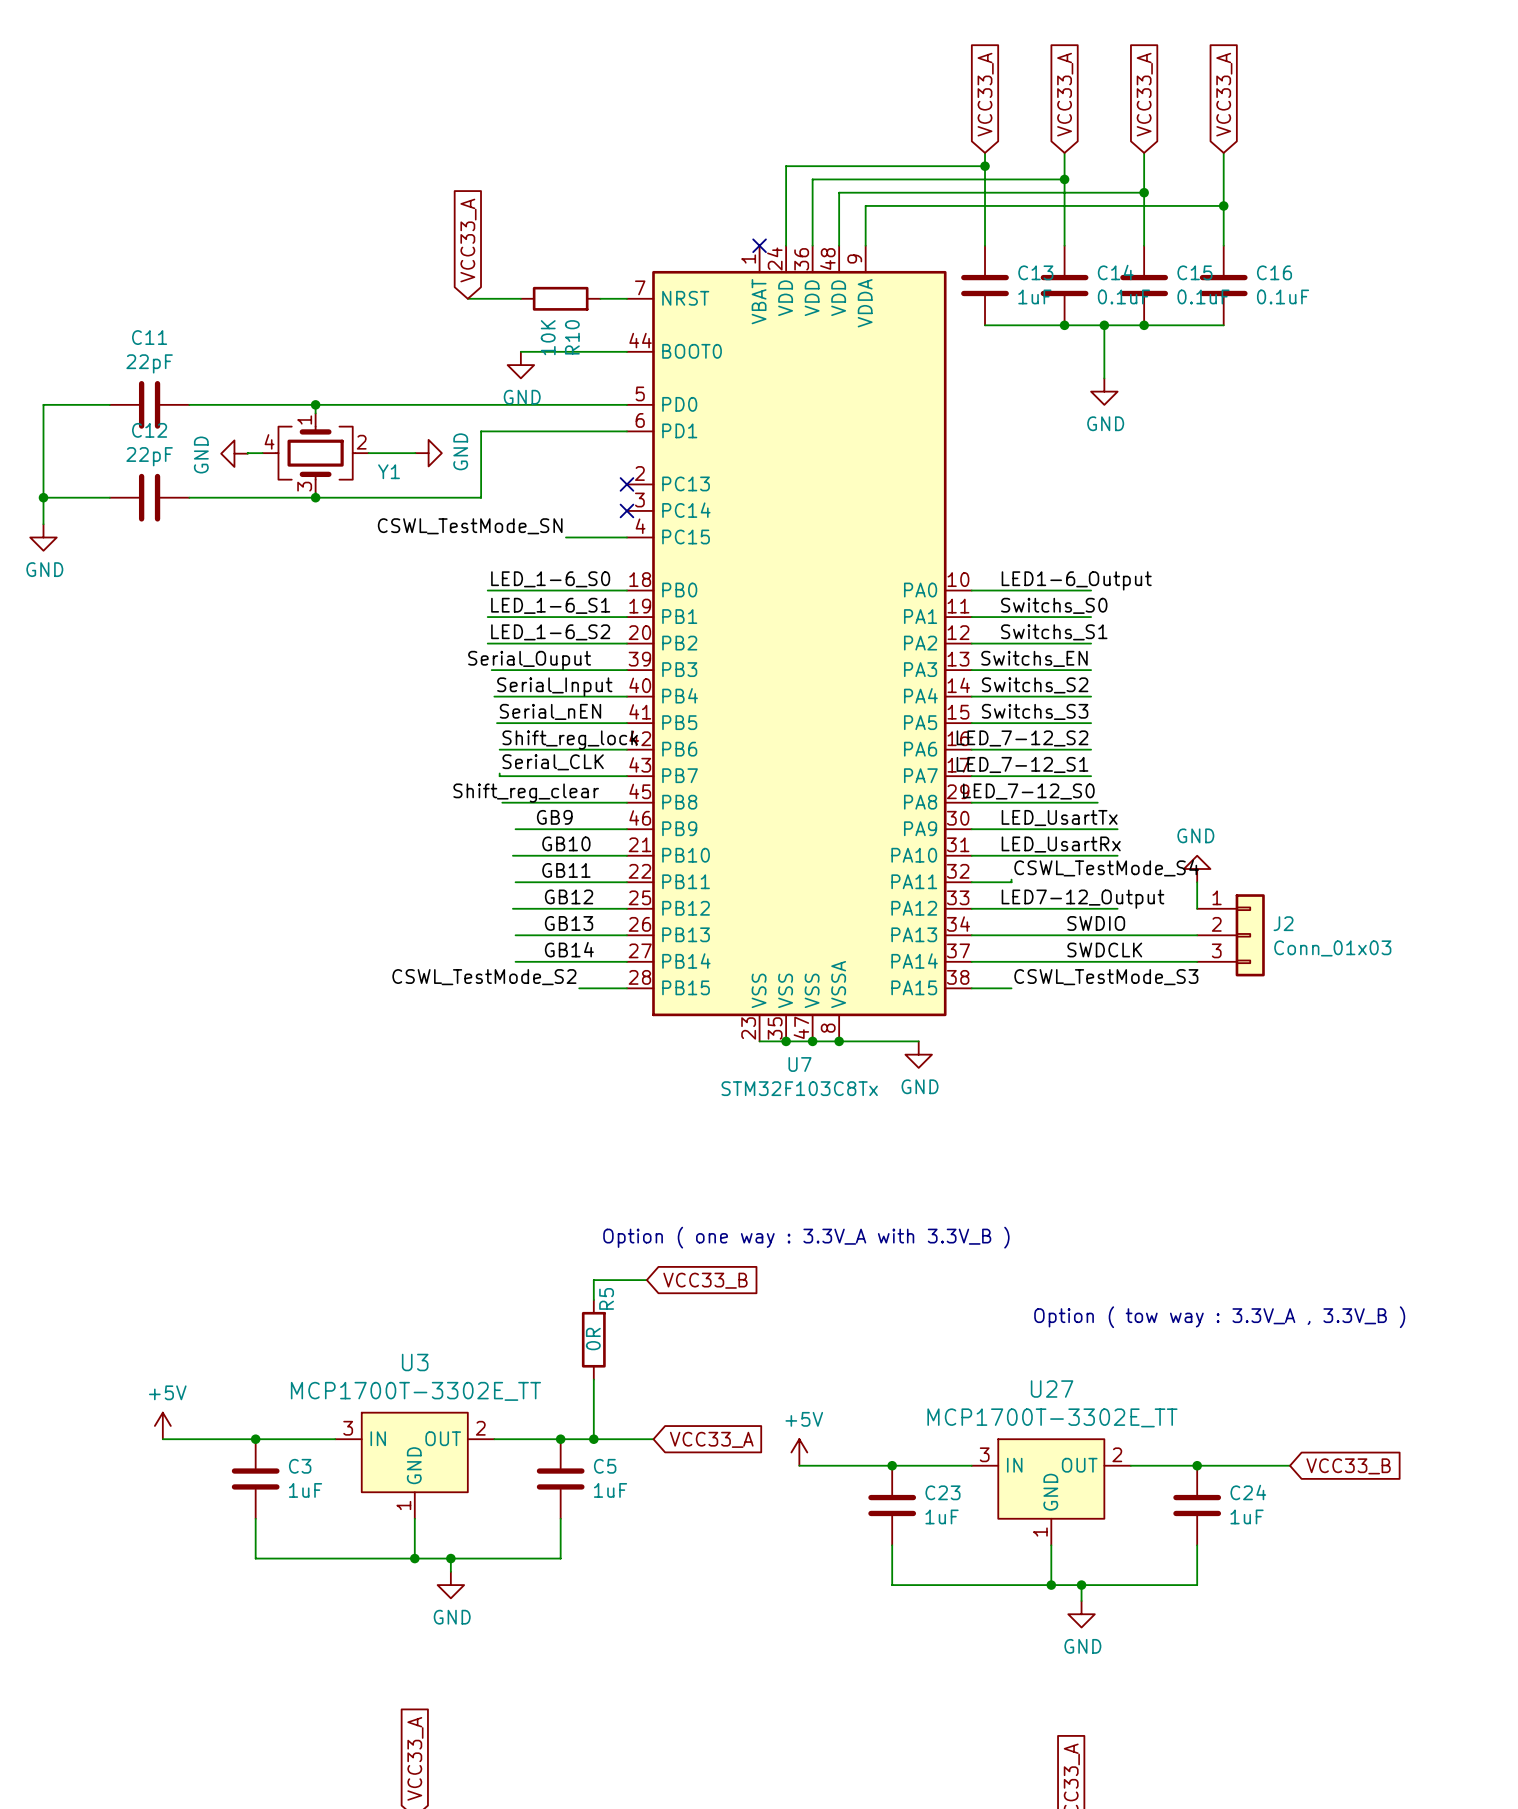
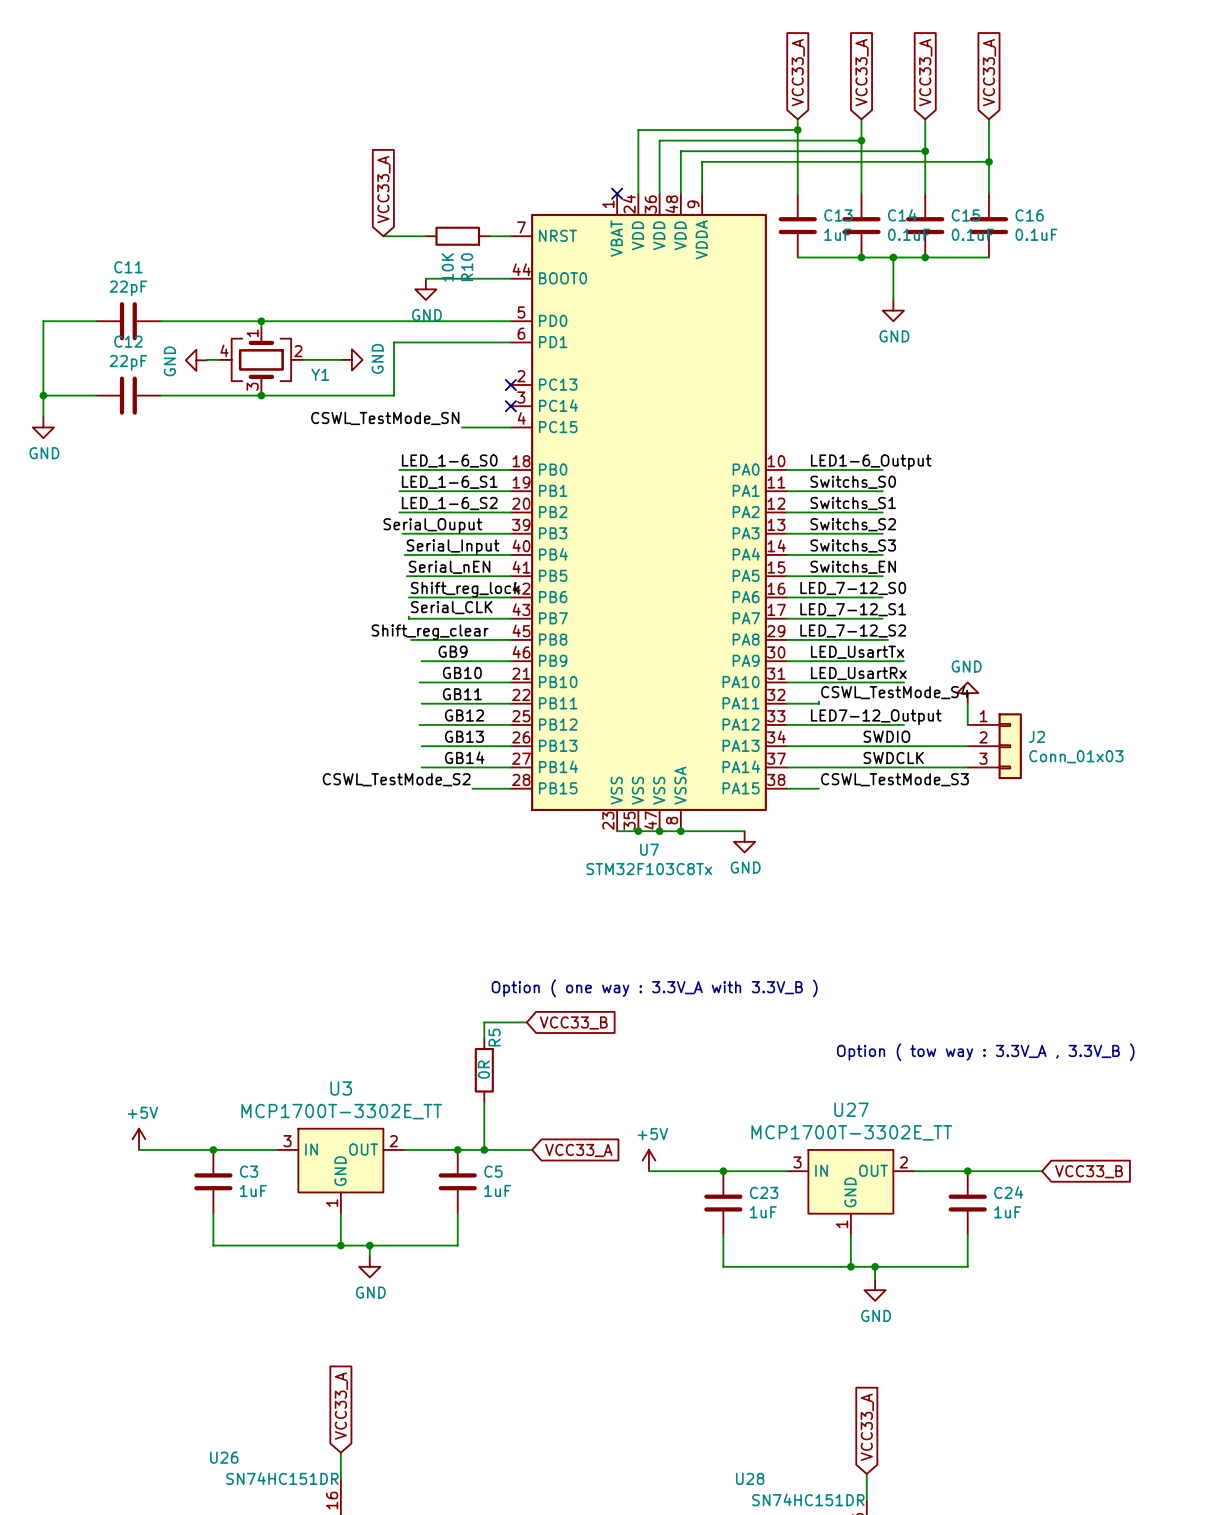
label position: Switchs_EN (1034, 658) -> Switchs_EN (853, 567)
label position: Switchs_S2 (1035, 685) -> Switchs_S2 (853, 524)
label position: Switchs_S3 (1035, 711) -> Switchs_S3 (853, 545)
label position: LED_7-12_S2 (1022, 738) -> LED_7-12_S2 (853, 630)
label position: LED_7-12_S1 (1022, 764) -> LED_7-12_S1 (853, 609)
label position: LED_7-12_S0 (1028, 791) -> LED_7-12_S0 (853, 588)

